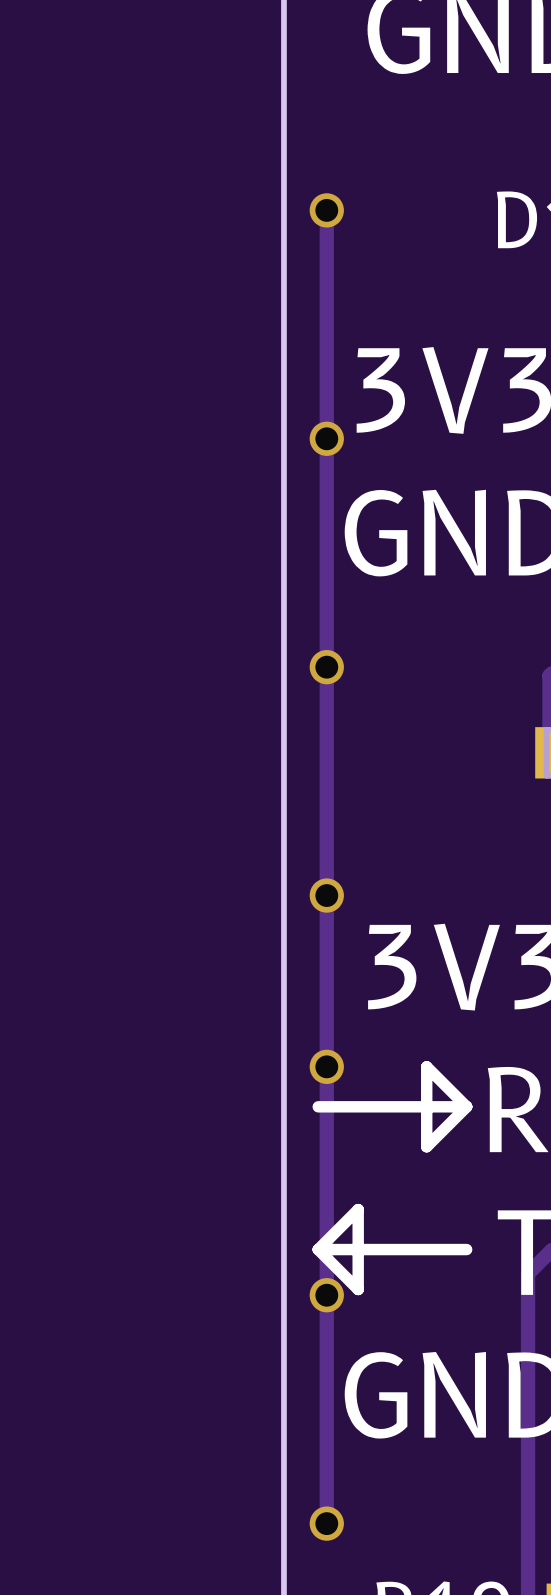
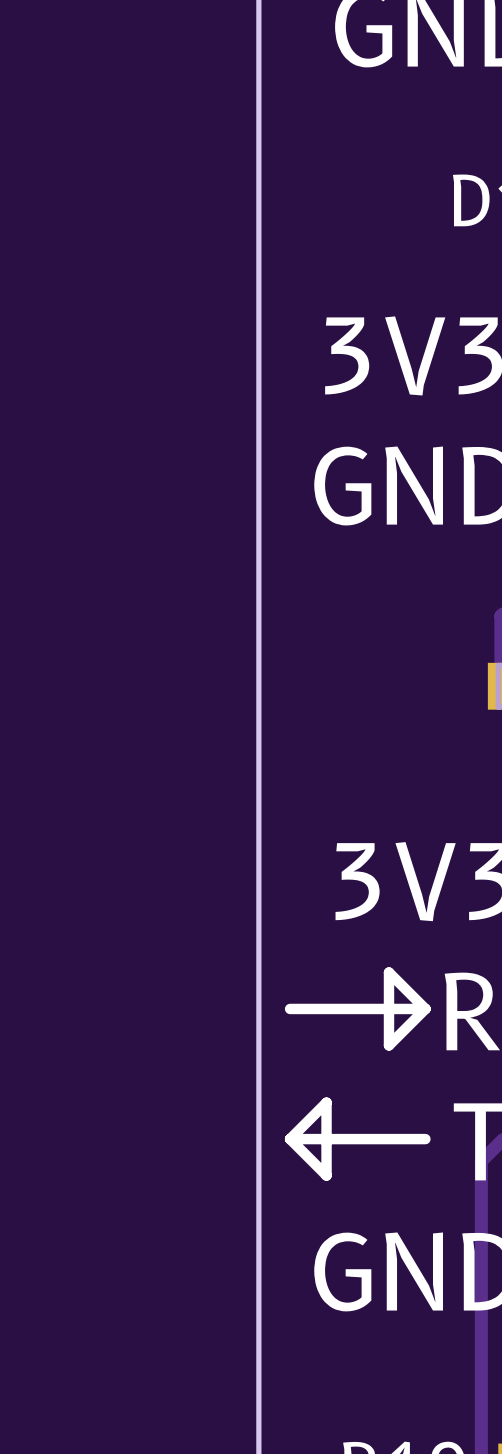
track: (326, 210) (326, 1523) -> none
via: (326, 210) -> none
via: (326, 438) -> none
via: (326, 667) -> none
via: (326, 895) -> none
via: (326, 1066) -> none
via: (326, 1295) -> none
via: (326, 1523) -> none

